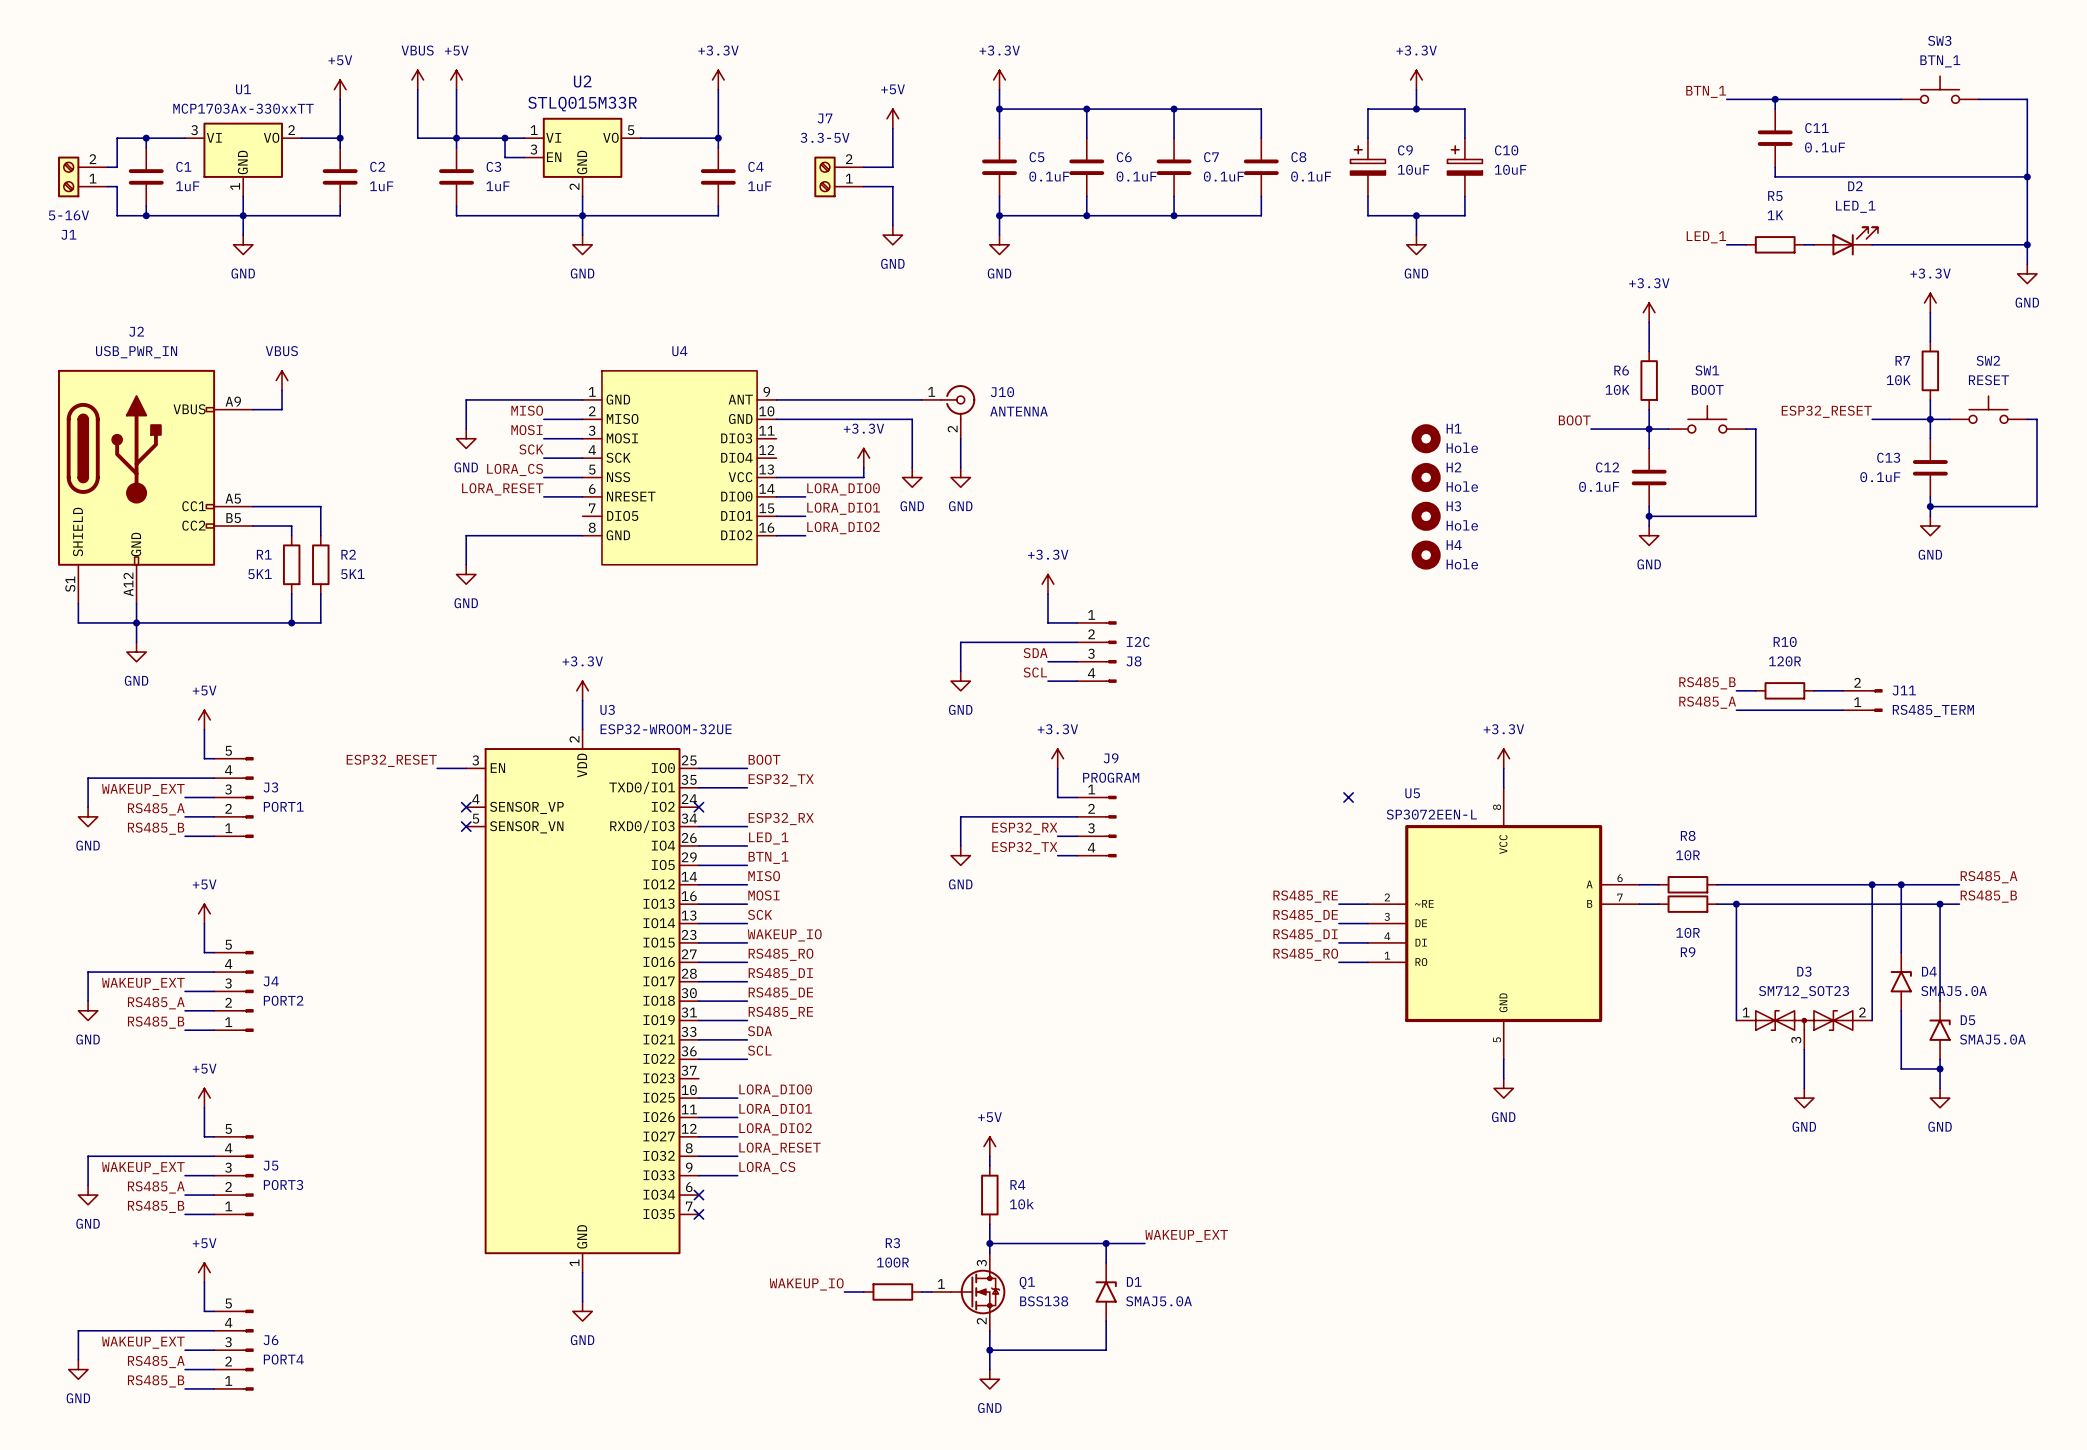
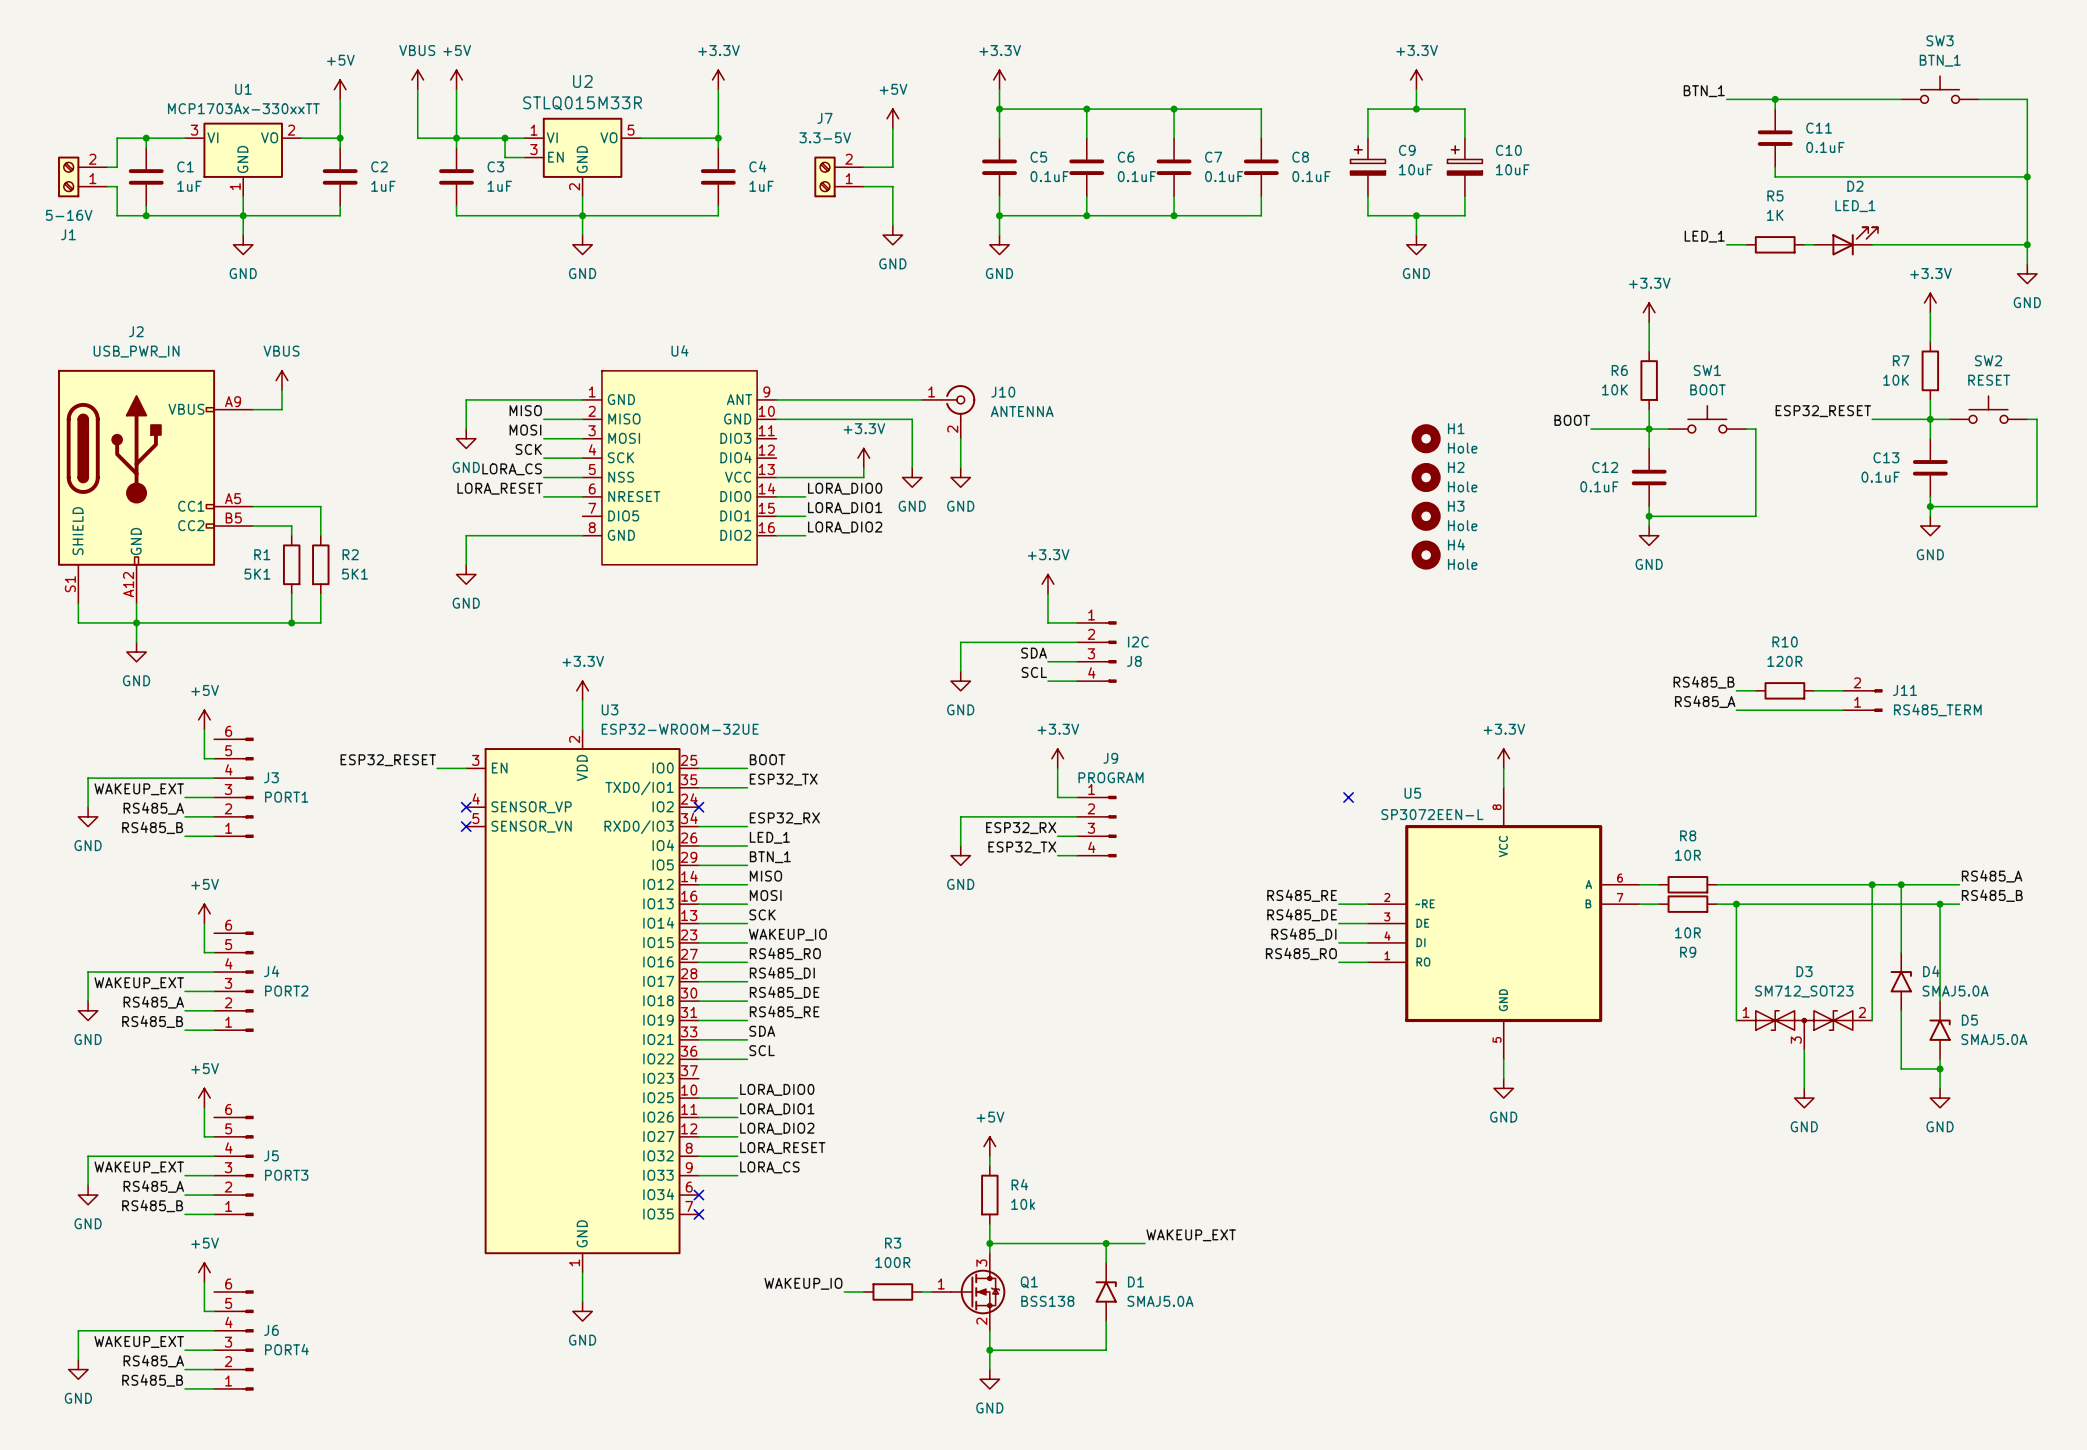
J3 symbol: [214, 757, 254, 838] -> [214, 737, 254, 838]
J4 symbol: [214, 951, 254, 1032] -> [214, 931, 254, 1032]
J5 symbol: [214, 1135, 254, 1216] -> [214, 1115, 254, 1216]
J6 symbol: [214, 1309, 254, 1391] -> [214, 1290, 254, 1391]

